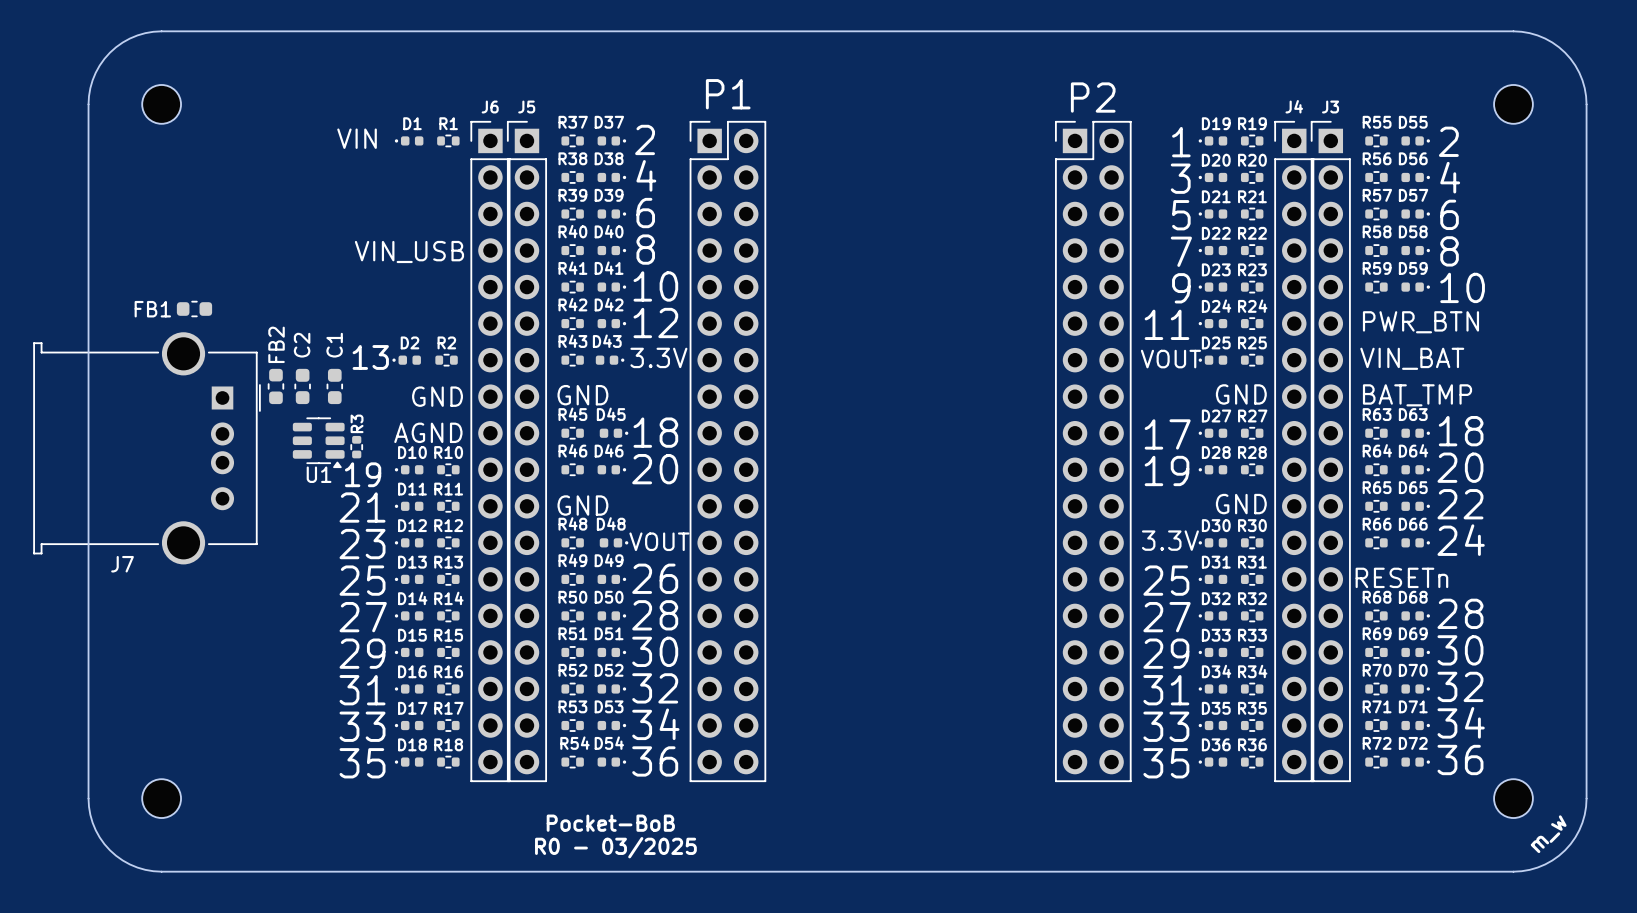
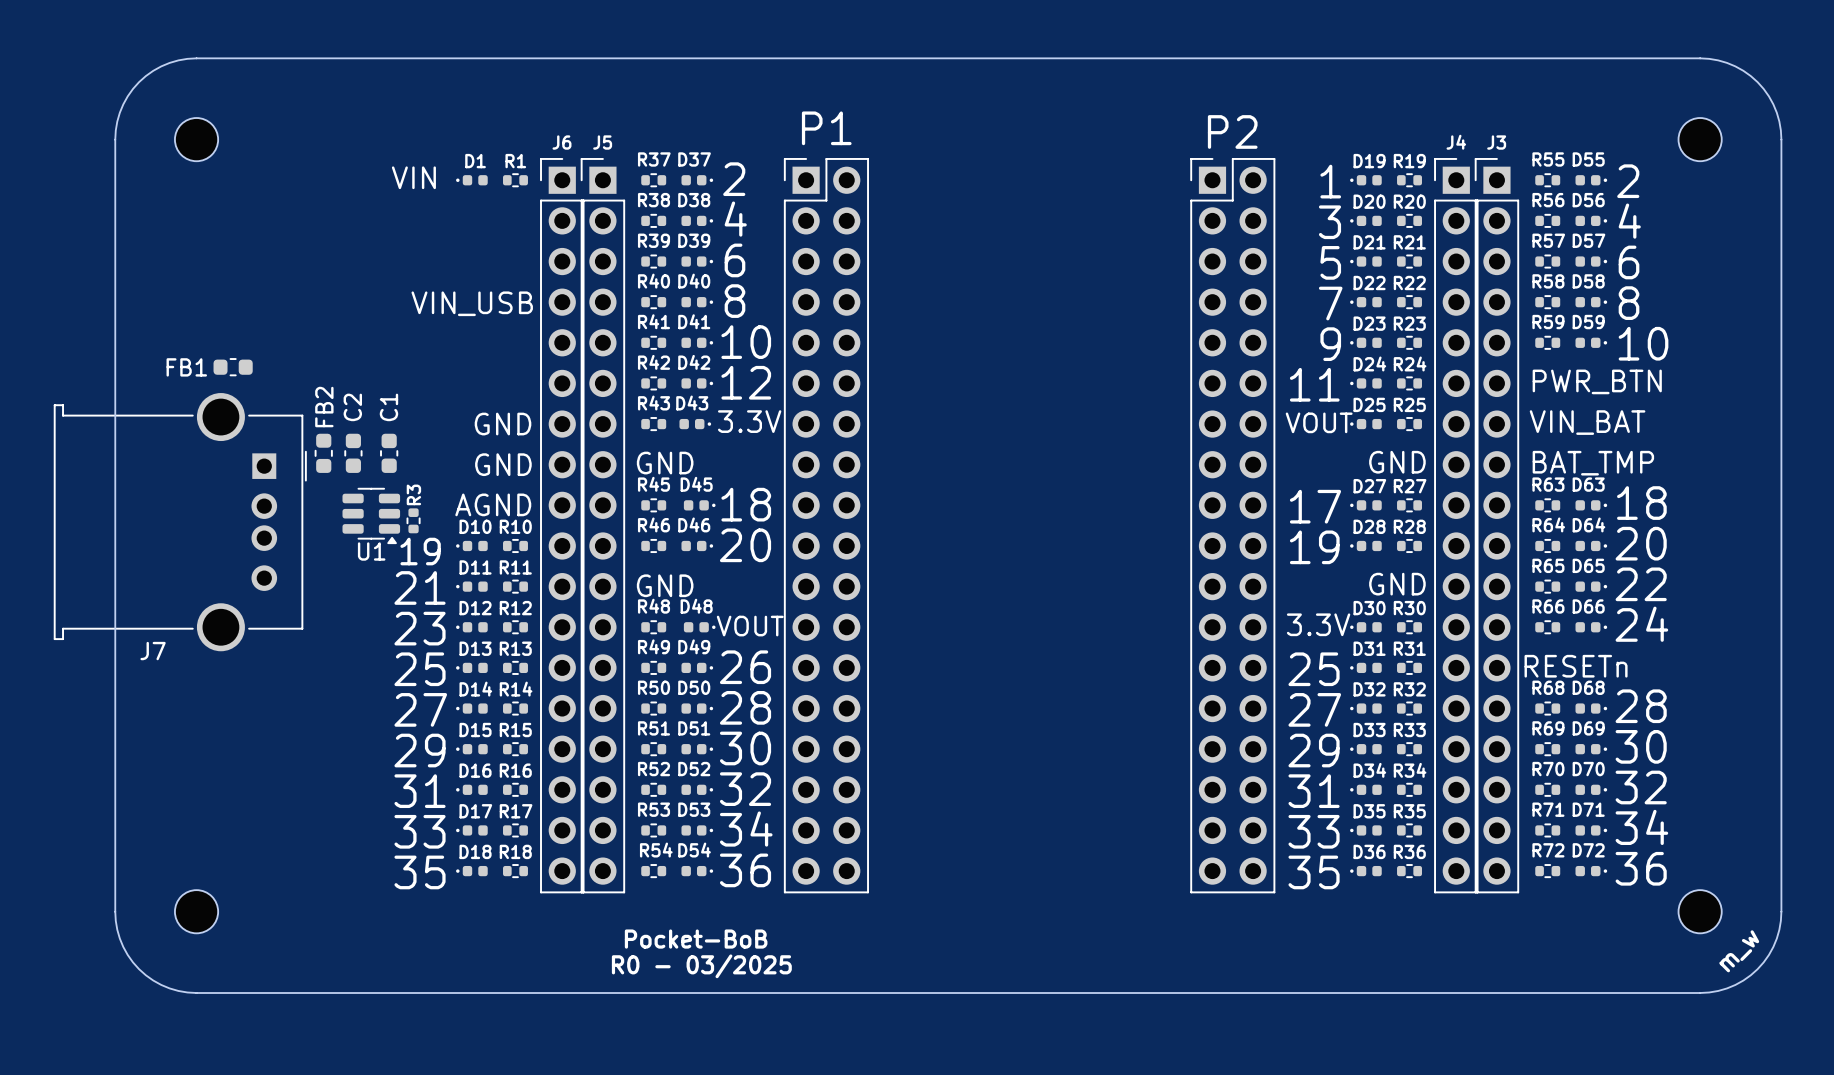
text: 13 (370, 357) -> none
D2: (406, 360) -> none
text: none -> GND (503, 424)
R2: (446, 360) -> none

